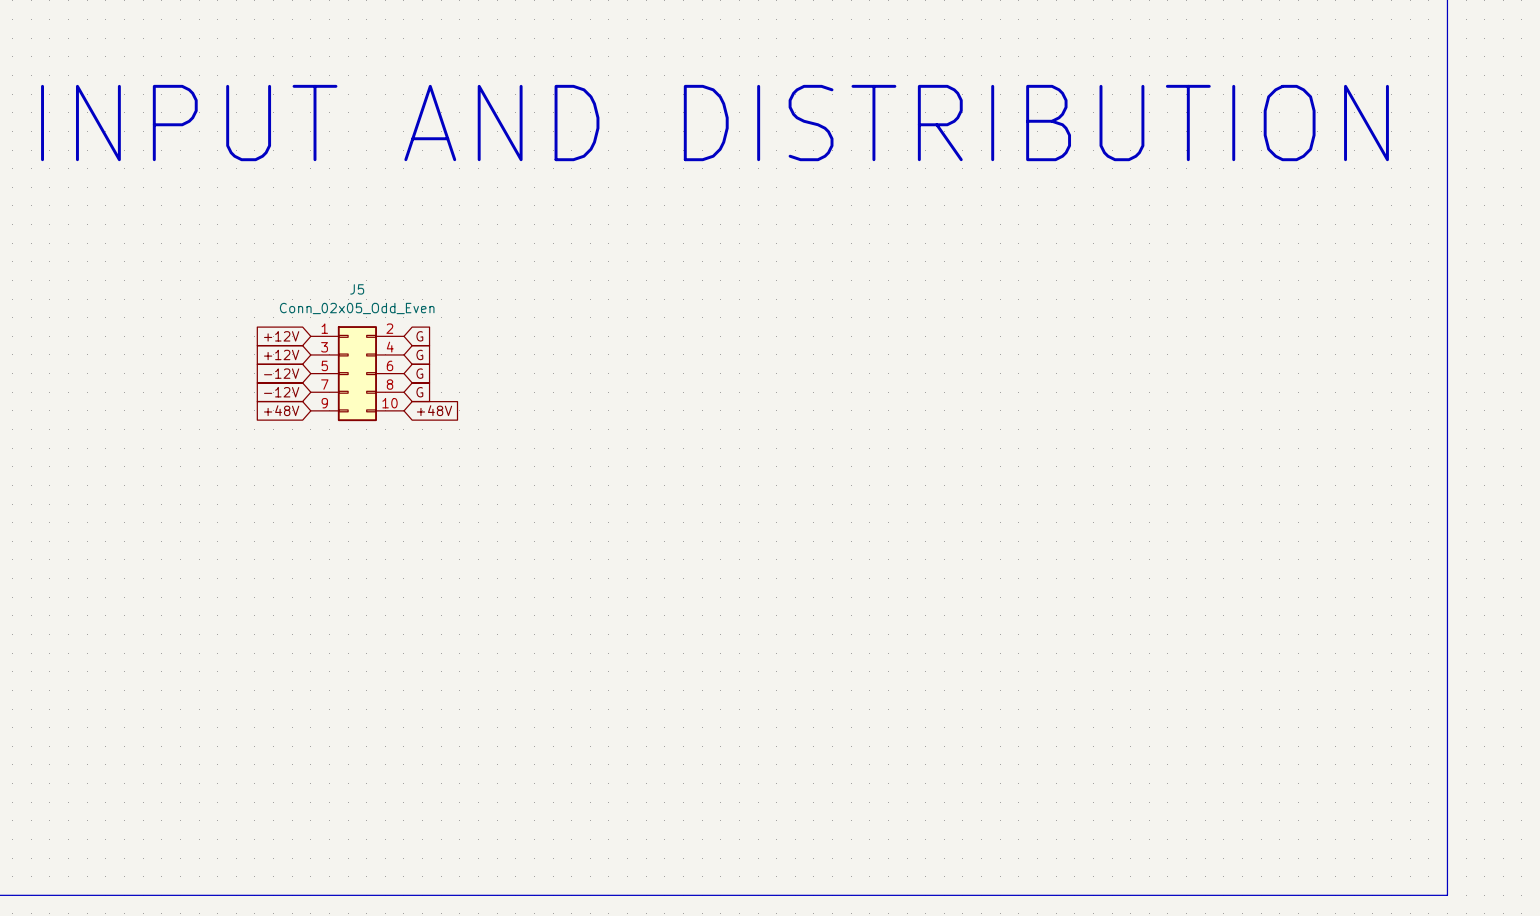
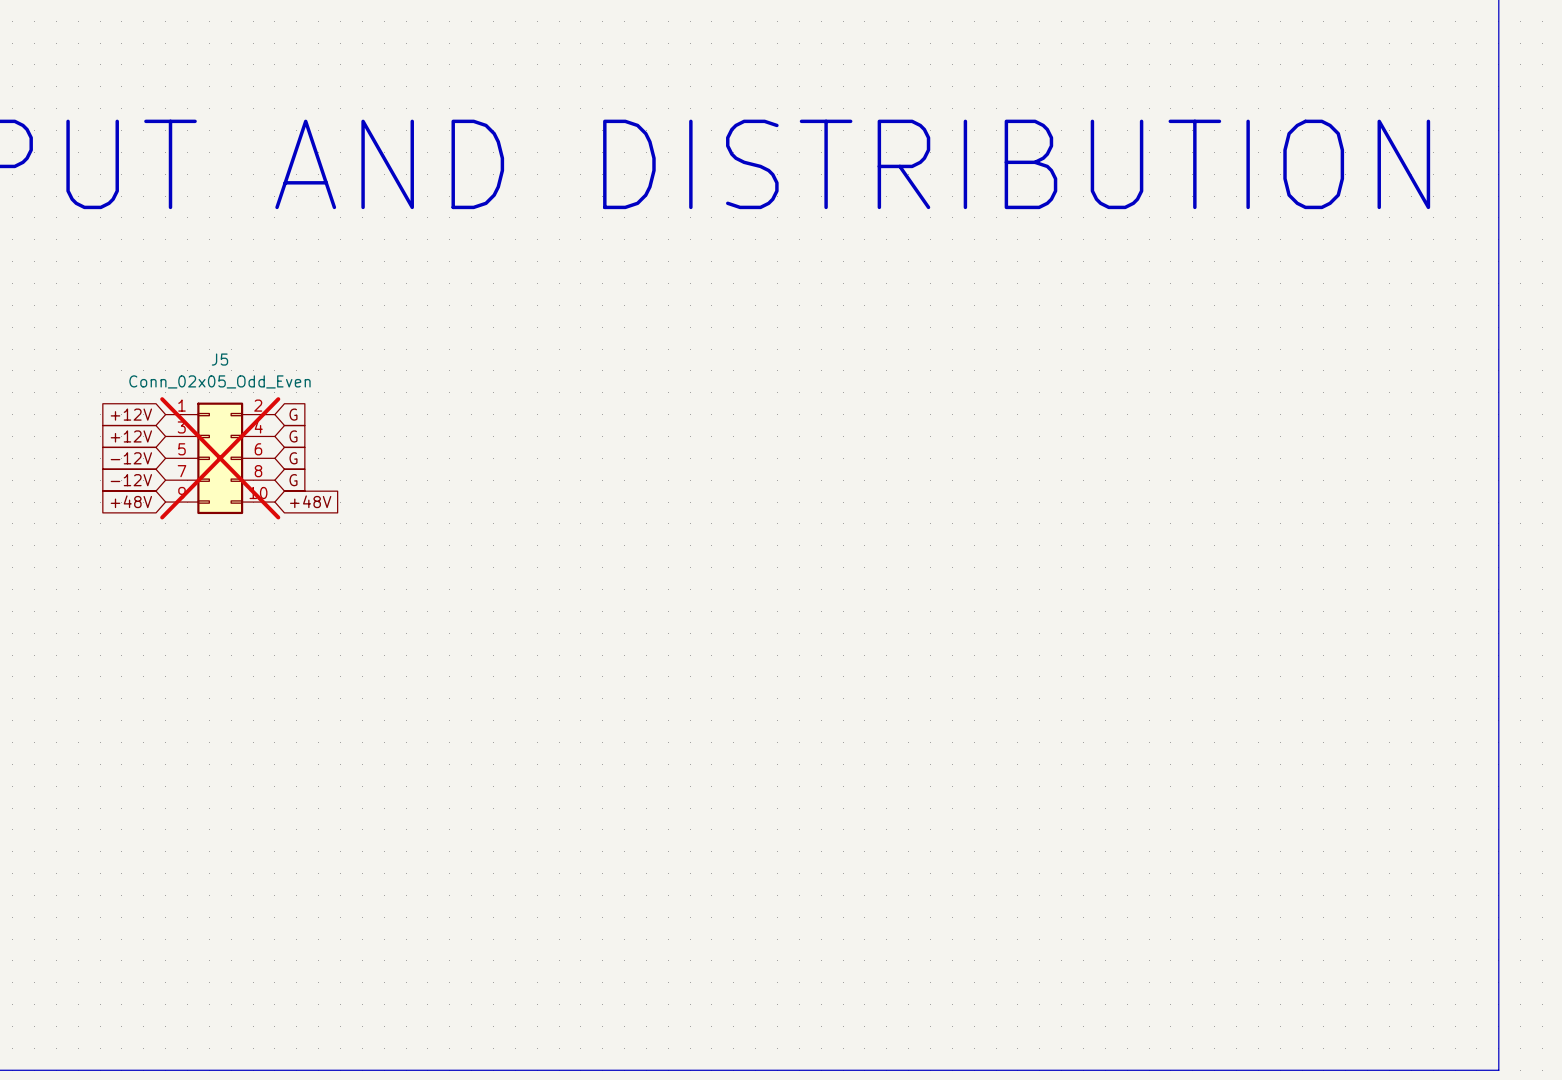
J5 do-not-place cross: none -> (220, 458)

